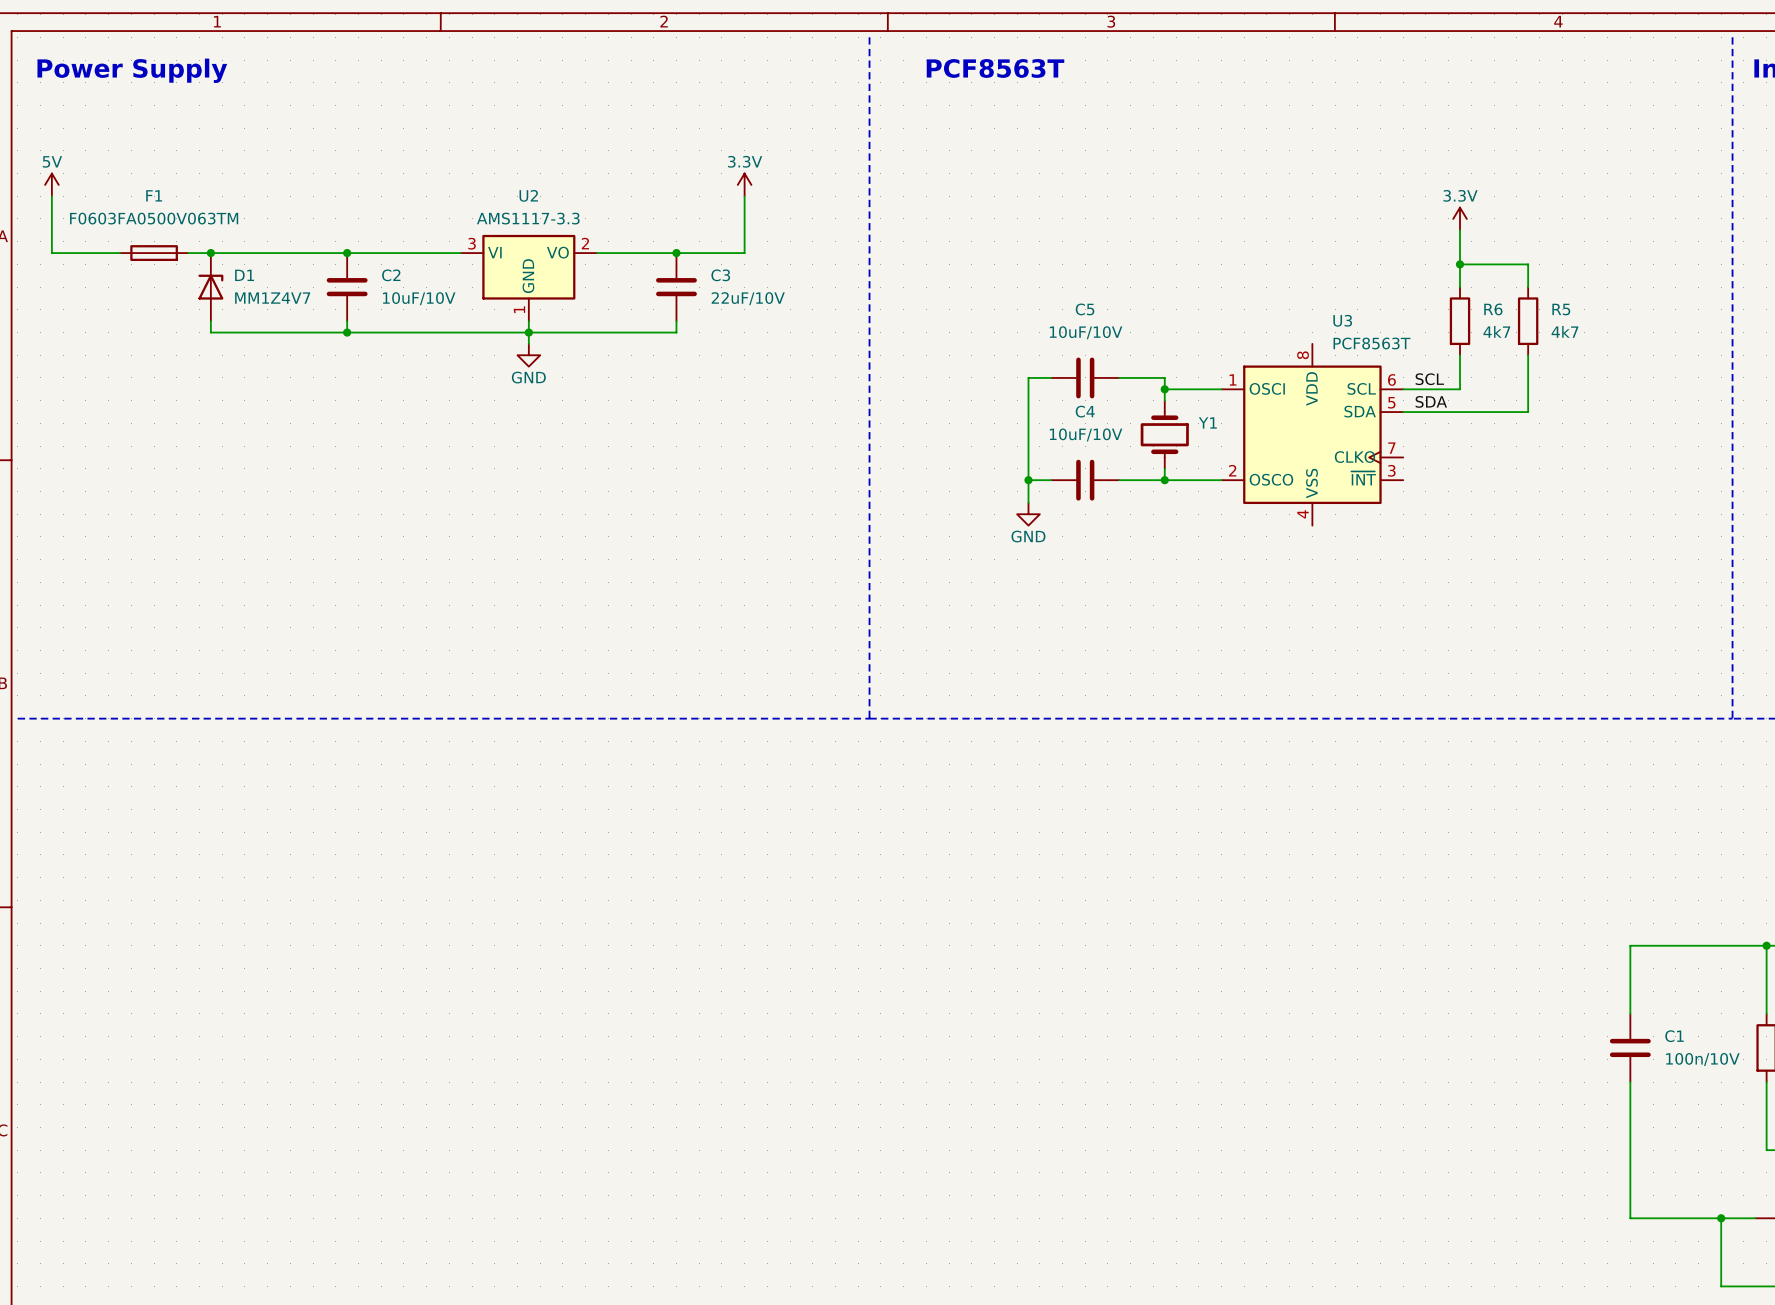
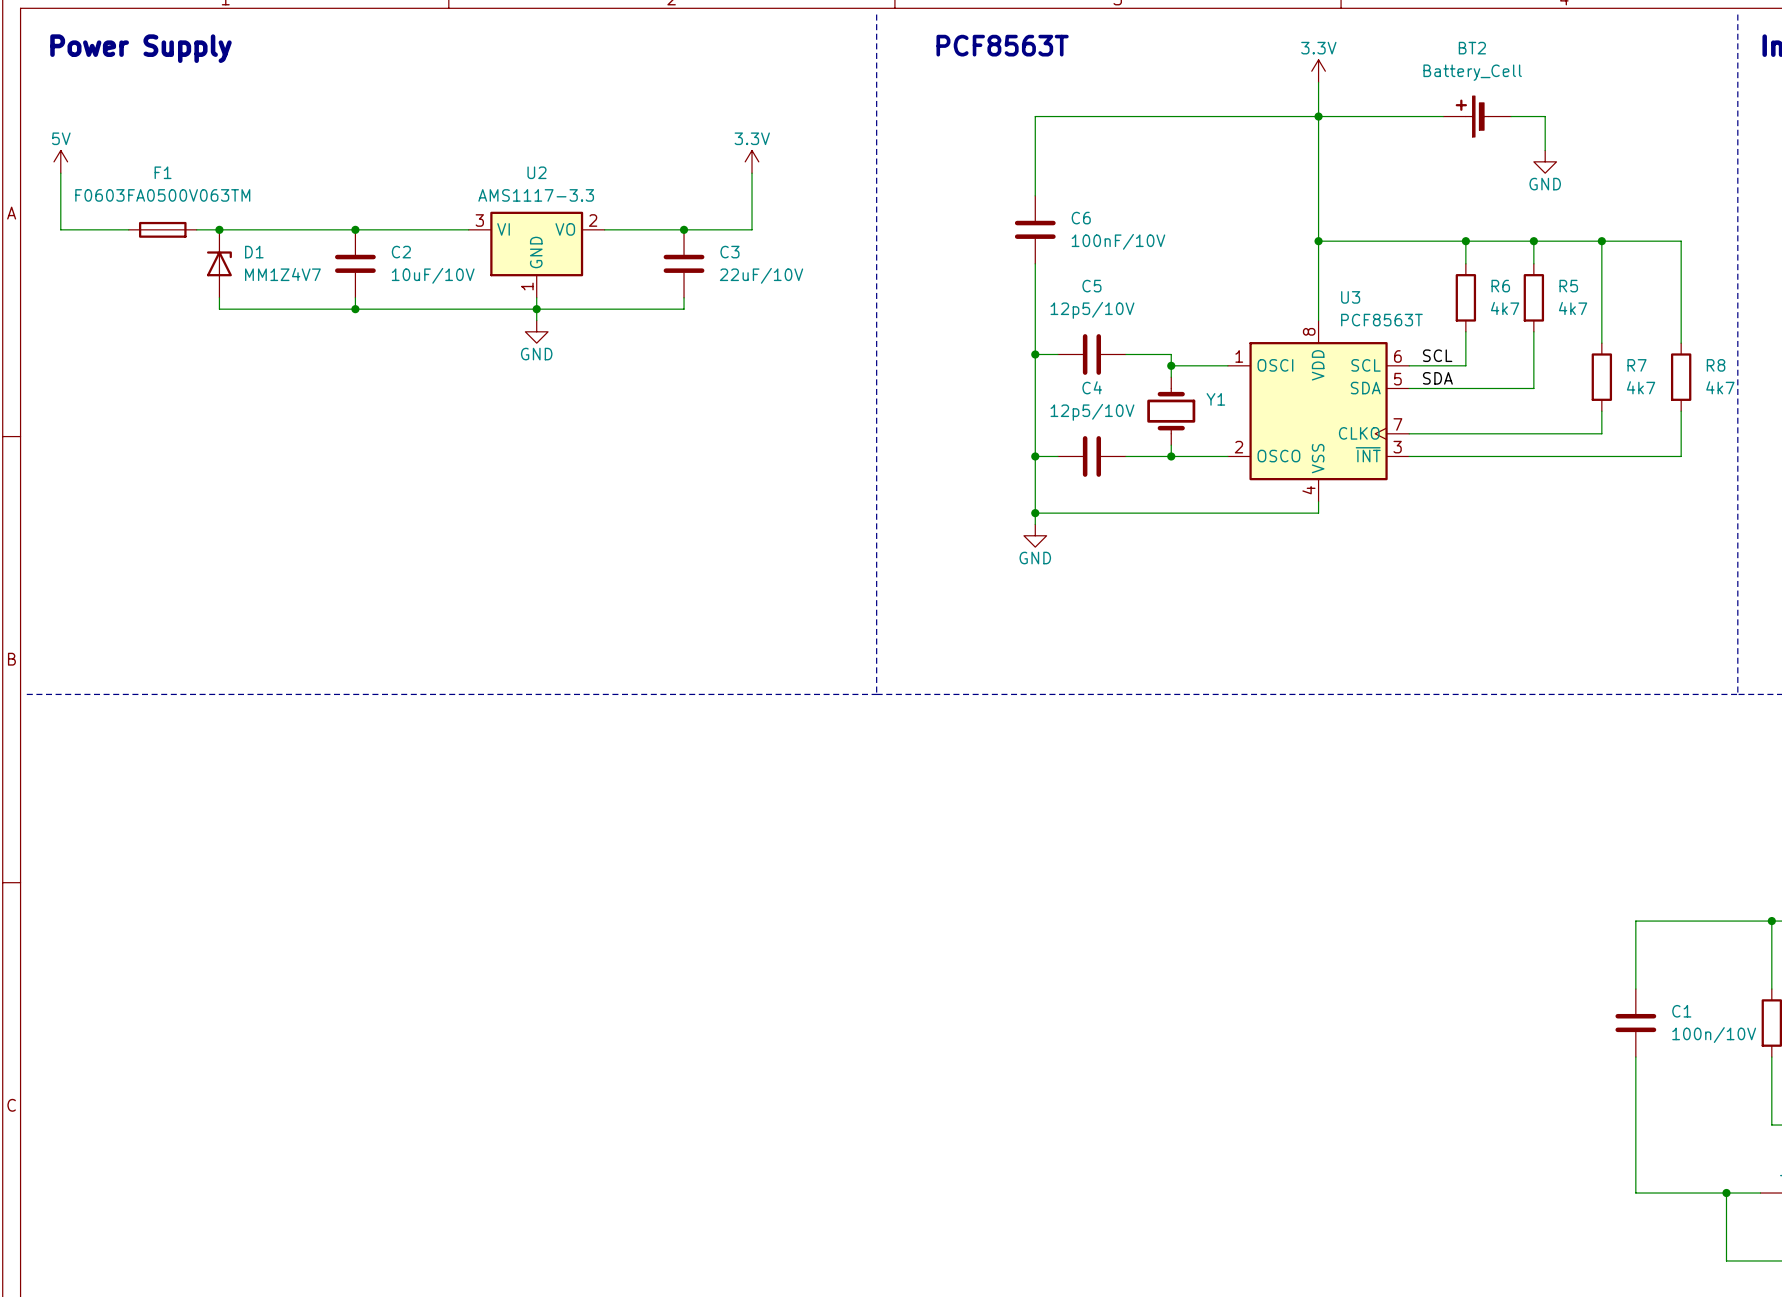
wire: none -> (1318, 82) (1318, 320)
junction: none -> (1318, 116)
wire: none -> (1443, 116) (1035, 116) (1035, 195)
BT2: none -> Battery_Cell (1477, 116)
wire: none -> (1511, 116) (1545, 116) (1545, 150)
power symbol: none -> GND (1545, 161)
power symbol position: 3.3V (1460, 218) -> 3.3V (1318, 71)
wire: (1460, 230) (1460, 264) -> (1318, 241) (1465, 241)
C6: none -> 100nF/10V (1035, 229)
junction: none -> (1318, 241)
wire: none -> (1533, 241) (1681, 241) (1681, 343)
junction: none -> (1533, 241)
wire: none -> (1601, 241) (1601, 343)
junction: none -> (1601, 241)
wire: none -> (1035, 263) (1035, 354)
C5 value: 10uF/10V (1086, 332) -> 12p5/10V (1092, 310)
junction: none -> (1035, 354)
R7: none -> 4k7 (1601, 377)
R8: none -> 4k7 (1681, 377)
C4 value: 10uF/10V (1086, 434) -> 12p5/10V (1092, 412)
wire: none -> (1601, 411) (1601, 433) (1409, 433)
wire: none -> (1681, 411) (1681, 456) (1409, 456)
wire: none -> (1035, 479) (1035, 524)
power symbol position: GND (1028, 514) -> GND (1035, 535)
wire: none -> (1318, 501) (1318, 513) (1035, 513)
junction: none -> (1035, 513)

